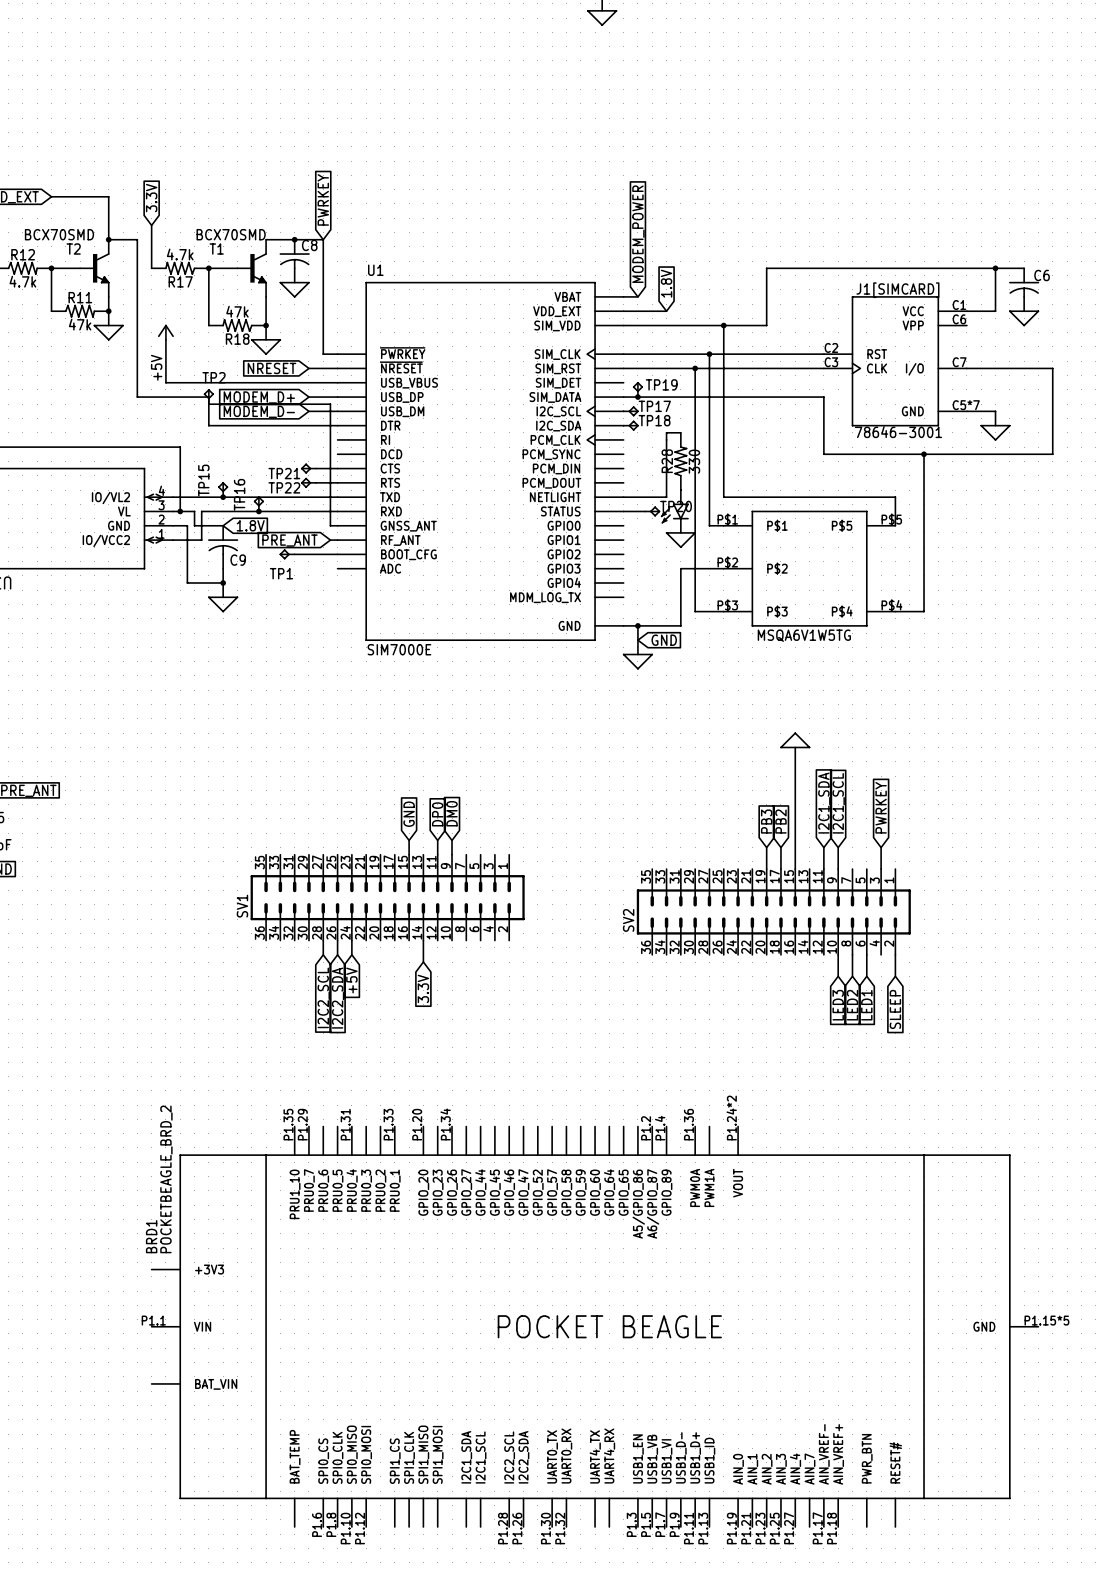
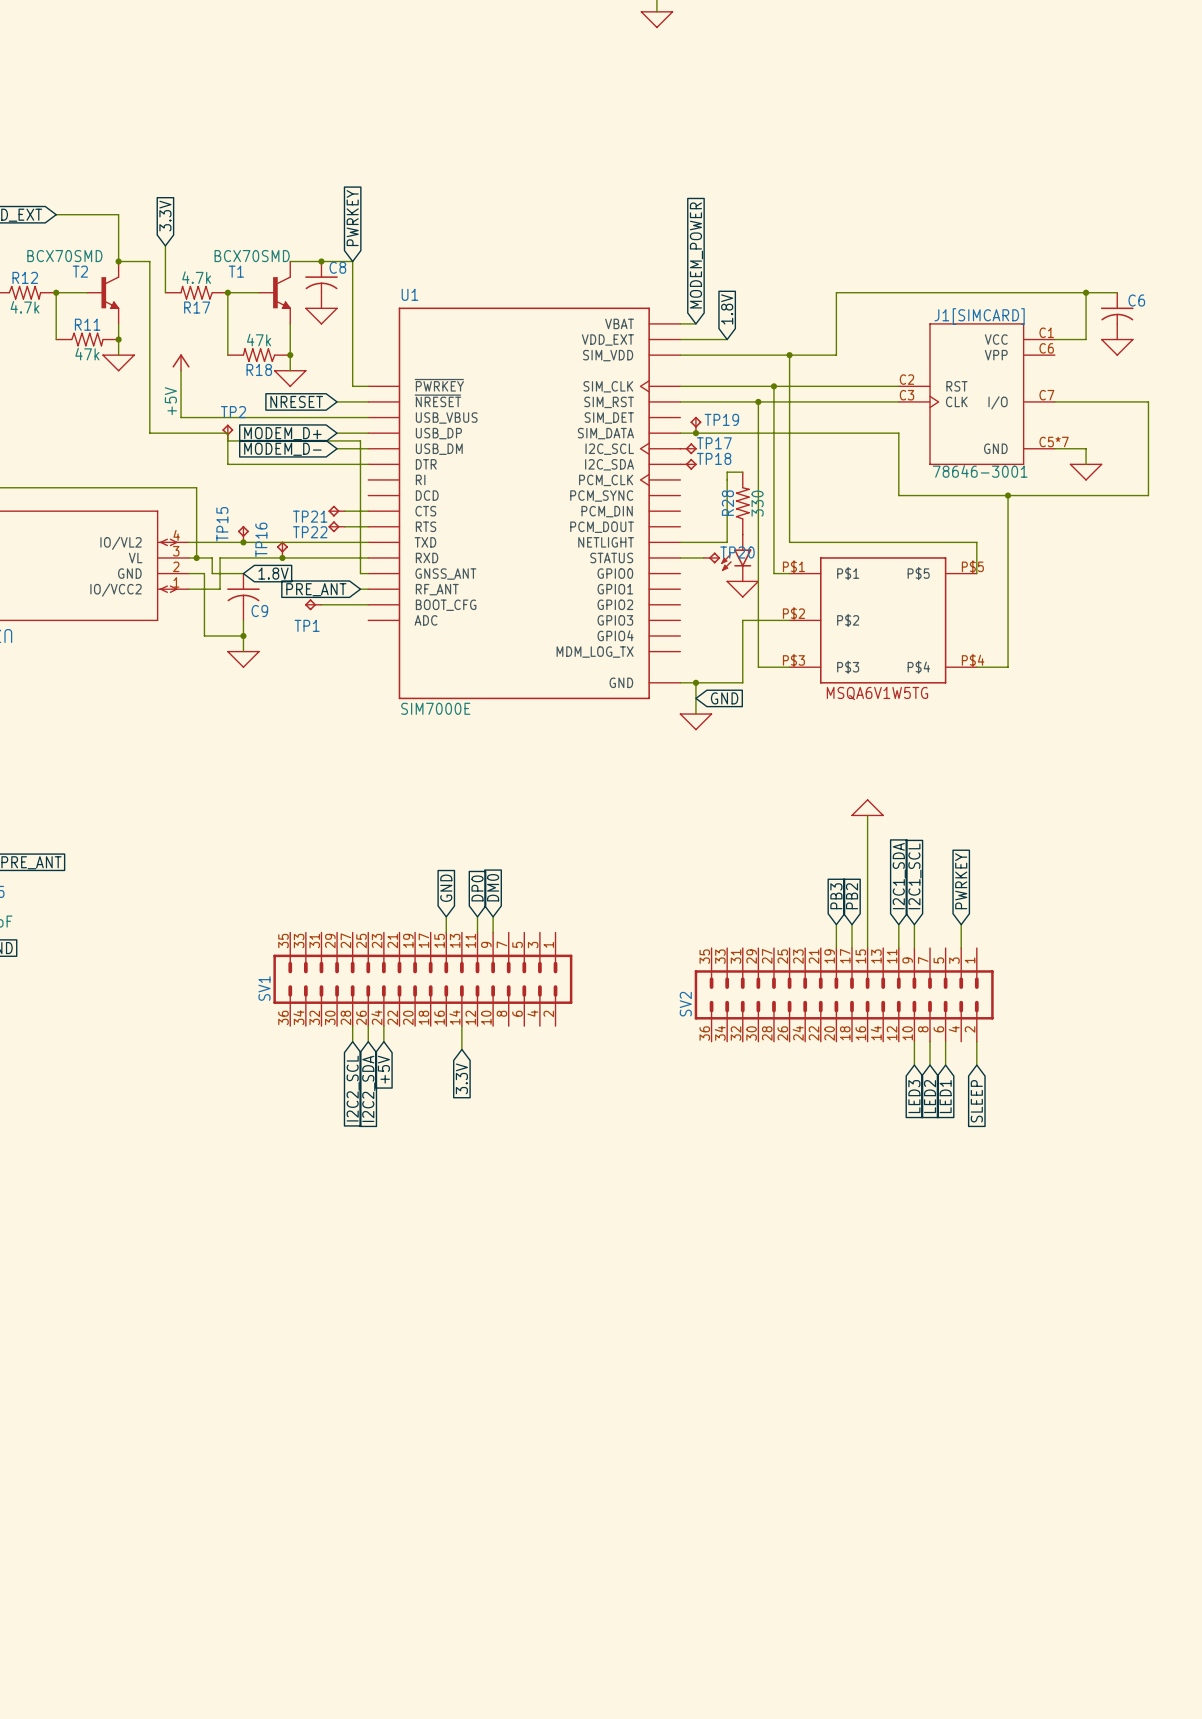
BRD1: POCKETBEAGLE_BRD_2 (595, 1326) -> none

